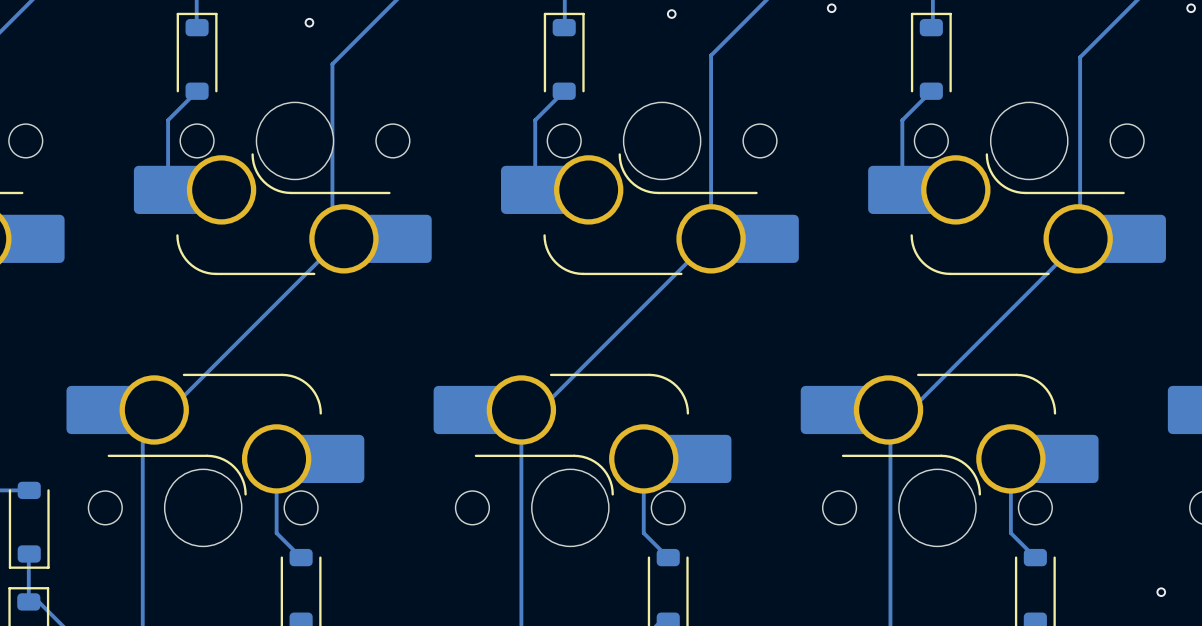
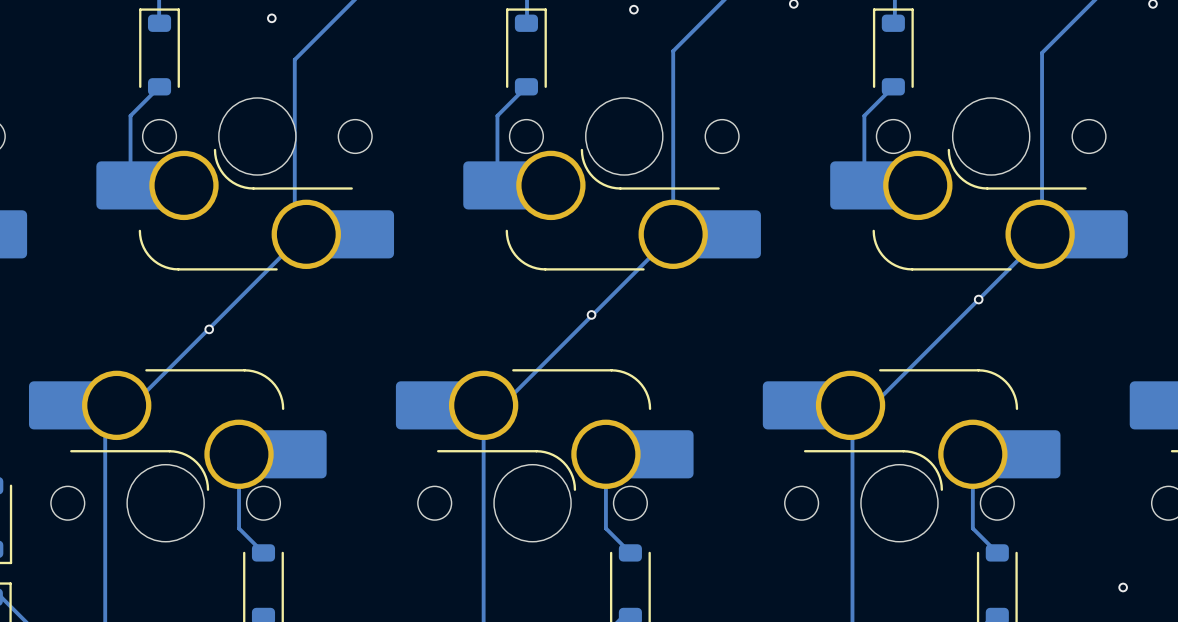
via: none -> (978, 299)
via: none -> (591, 314)
via: none -> (209, 329)

